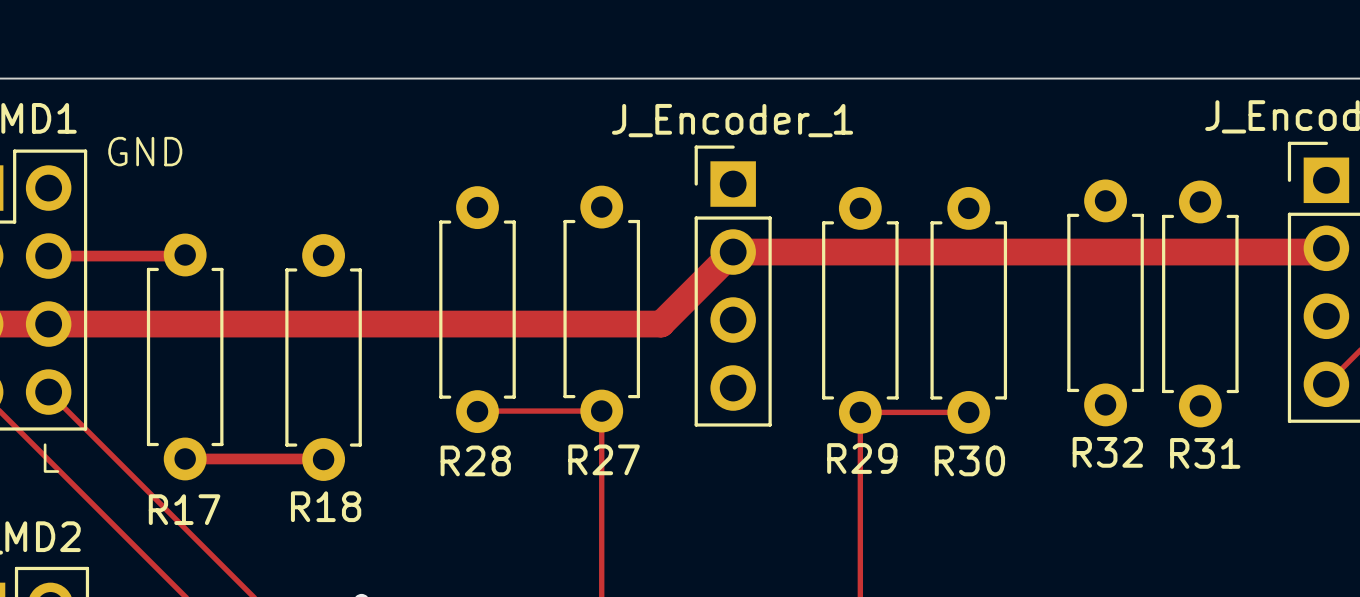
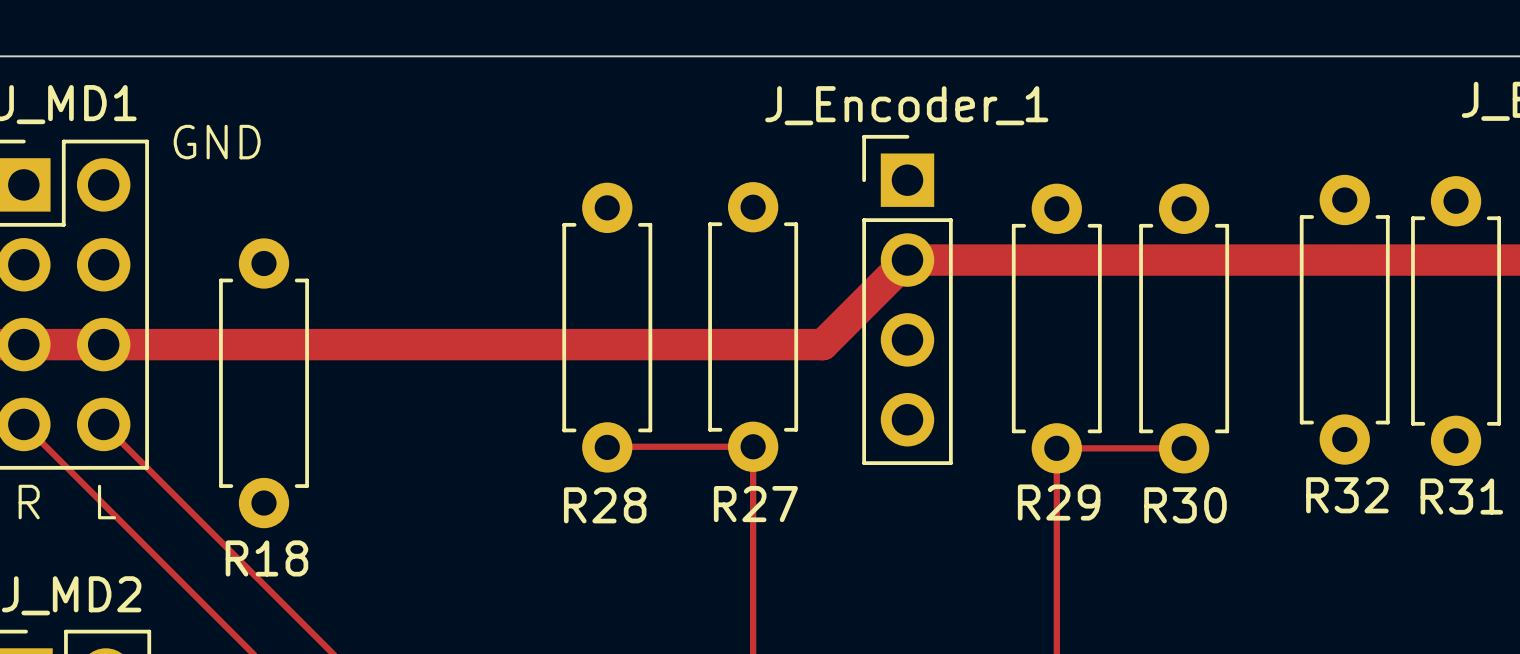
track: (185, 254) (48, 256) -> none
R18: (323, 357) -> none
track: (185, 458) (323, 459) -> none
R17 name: R17 (184, 509) -> R18 (266, 558)

